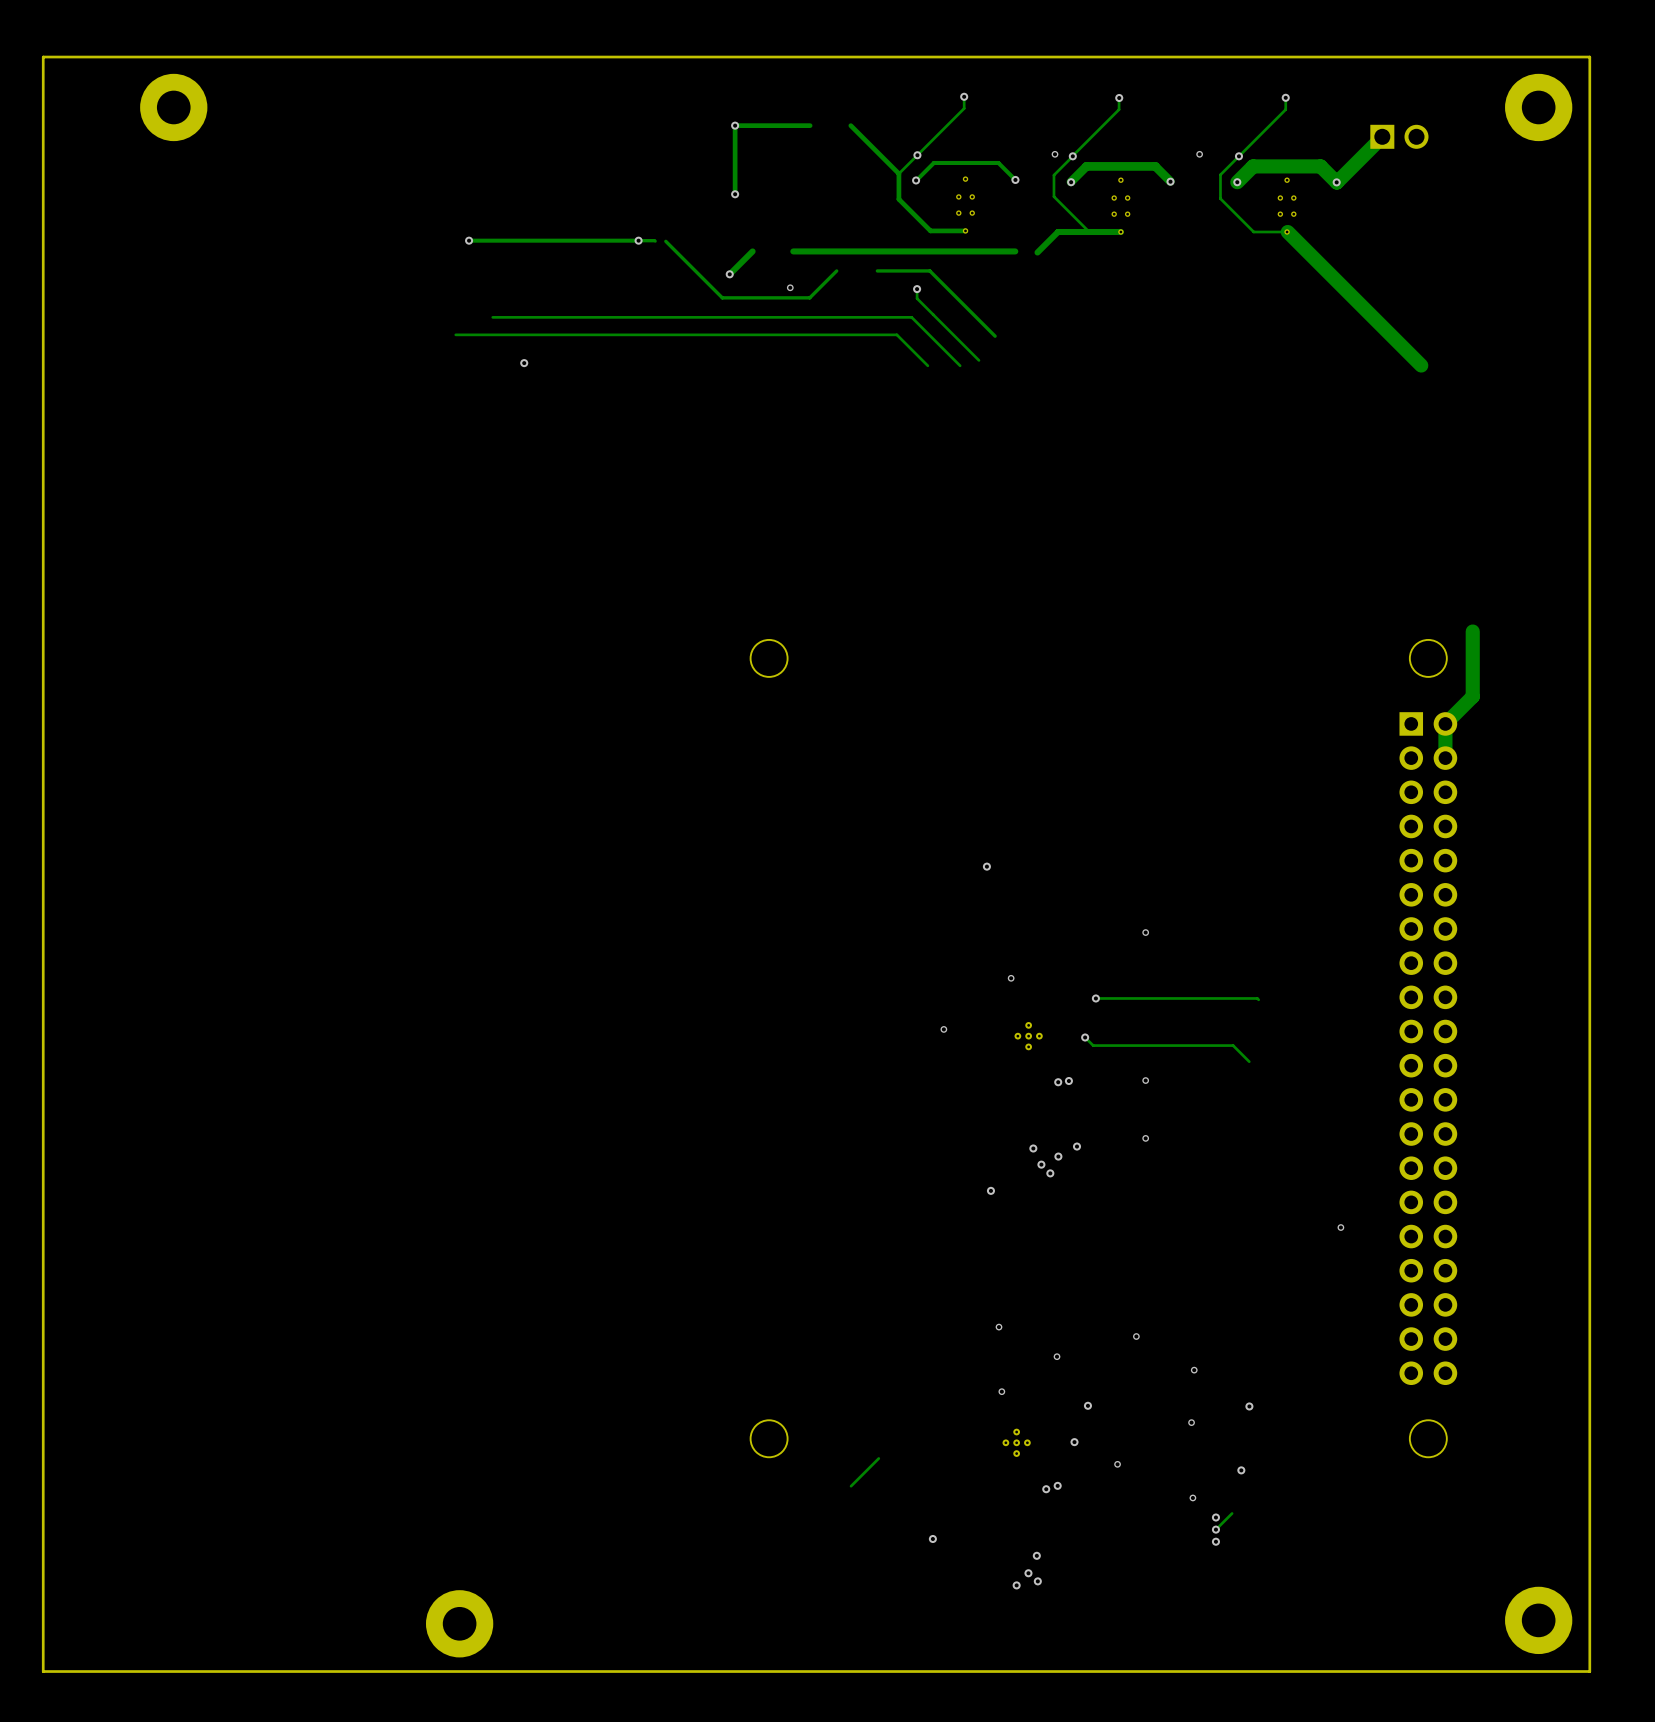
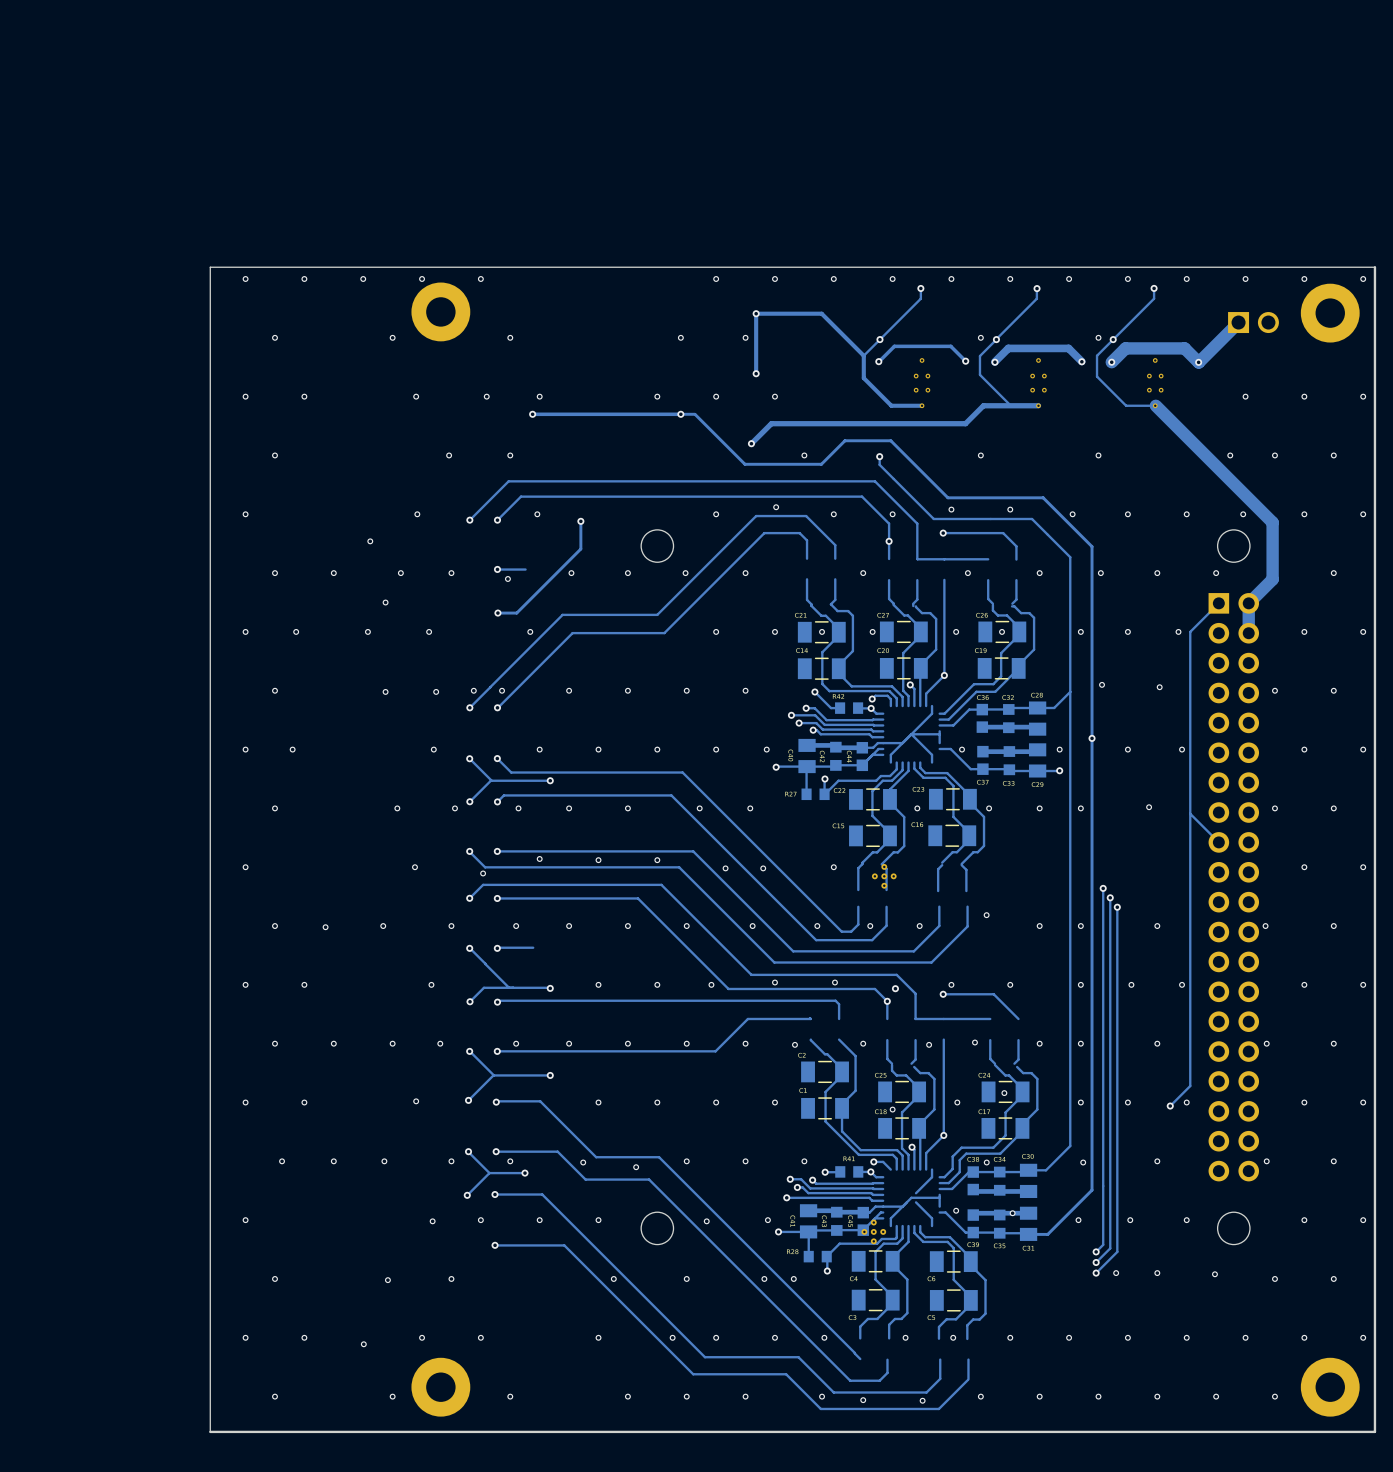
track: (964, 96) (964, 108) (898, 173) -> (920, 288) (920, 298) (863, 355)
via: (964, 96) -> none
track: (1119, 97) (1119, 109) (1072, 155) -> (1036, 288) (1036, 298) (996, 339)
via: (1119, 97) -> none
track: (1285, 97) (1285, 109) (1220, 174) (1220, 198) (1253, 232) (1287, 232) -> (1154, 288) (1154, 298) (1097, 355) (1097, 376) (1126, 405) (1155, 405)
via: (1285, 97) -> none
part: (173, 107) -> none
part position: (1538, 107) -> (1330, 313)
via: (735, 125) -> none
track: (810, 125) (735, 125) (735, 194) -> none
track: (850, 125) (898, 173) -> none
part position: (1399, 136) -> (1253, 322)
track: (1382, 137) (1336, 182) -> (1238, 322) (1198, 362)
via: (1054, 154) -> none
via: (1199, 154) -> none
via: (917, 155) -> none
track: (1072, 156) (1053, 175) (1053, 196) (1088, 231) -> (996, 339) (979, 356) (979, 374) (1010, 405)
via: (1072, 156) -> none
via: (1238, 156) -> none
track: (898, 173) (898, 199) (930, 230) (965, 230) -> (863, 355) (863, 378) (891, 405) (922, 405)
track: (1015, 179) (998, 162) (933, 162) (916, 180) -> (965, 361) (950, 346) (894, 346) (879, 361)
via: (1015, 179) -> none
via: (916, 180) -> none
track: (1170, 181) (1155, 166) (1086, 166) (1070, 181) -> (1081, 361) (1068, 348) (1008, 348) (994, 361)
via: (1170, 181) -> none
via: (1071, 182) -> none
track: (1237, 182) (1253, 166) (1320, 166) (1336, 182) -> (1111, 362) (1125, 348) (1184, 348) (1198, 362)
via: (1237, 182) -> none
via: (1336, 182) -> none
via: (735, 194) -> none
part: (965, 205) -> none
part: (1120, 206) -> none
part: (1287, 206) -> none
track: (1120, 232) (1058, 232) (1037, 252) -> none
track: (1287, 232) (1421, 365) -> (1155, 405) (1272, 522)
track: (469, 240) (655, 241) -> none
via: (469, 240) -> none
via: (638, 240) -> none
track: (665, 241) (722, 297) (809, 297) (836, 270) -> none
track: (752, 251) (729, 274) -> none
track: (1015, 251) (793, 251) -> none
track: (877, 270) (929, 270) (995, 336) -> none
via: (729, 274) -> none
via: (790, 287) -> none
track: (917, 289) (917, 298) (978, 360) -> none
via: (917, 289) -> none
track: (492, 317) (911, 317) (960, 365) -> none
track: (455, 334) (896, 334) (927, 365) -> none
board edge: (1589, 339) (1589, 57) (43, 57) (43, 1671) (257, 1671) -> (1374, 267) (210, 267) (210, 1431)
via: none -> (245, 279)
via: none -> (304, 279)
via: none -> (363, 279)
via: none -> (422, 279)
via: none -> (480, 279)
via: none -> (716, 279)
via: none -> (774, 279)
via: none -> (833, 279)
via: none -> (892, 279)
via: none -> (951, 279)
via: none -> (1010, 279)
via: none -> (1069, 279)
via: none -> (1127, 279)
via: none -> (1186, 279)
via: none -> (1245, 279)
via: none -> (1304, 279)
via: none -> (1363, 279)
via: (524, 363) -> none
via: none -> (920, 288)
via: none -> (1037, 288)
via: none -> (1154, 288)
part: none -> (440, 311)
via: none -> (756, 313)
via: none -> (274, 337)
via: none -> (392, 337)
via: none -> (510, 337)
via: none -> (680, 337)
via: none -> (745, 337)
via: none -> (980, 337)
via: none -> (1098, 337)
via: none -> (879, 339)
via: none -> (996, 339)
via: none -> (1113, 339)
track: none -> (863, 355) (821, 313) (756, 313) (756, 373)
via: none -> (878, 361)
via: none -> (965, 361)
via: none -> (1081, 361)
via: none -> (994, 362)
via: none -> (1111, 362)
via: none -> (1198, 362)
via: none -> (756, 373)
part: none -> (922, 383)
part: none -> (1038, 383)
part: none -> (1155, 383)
via: none -> (245, 396)
via: none -> (304, 396)
via: none -> (416, 396)
via: none -> (486, 396)
via: none -> (539, 396)
via: none -> (657, 396)
via: none -> (716, 396)
via: none -> (774, 396)
via: none -> (1245, 396)
via: none -> (1304, 396)
via: none -> (1363, 396)
track: none -> (1038, 405) (983, 405) (965, 423) (771, 423) (751, 443)
track: none -> (532, 414) (694, 414) (744, 464) (821, 464) (844, 440) (890, 440) (947, 497) (1043, 497) (1092, 546) (1092, 1190) (1047, 1234) (965, 1232) (945, 1212) (939, 1212)
via: none -> (532, 414)
via: none -> (680, 414)
via: none -> (751, 443)
via: none -> (274, 455)
via: none -> (449, 455)
via: none -> (510, 455)
via: none -> (804, 455)
via: none -> (980, 455)
via: none -> (1098, 455)
via: none -> (1230, 455)
via: none -> (1274, 455)
via: none -> (1333, 455)
track: none -> (879, 456) (879, 464) (933, 518) (1032, 518) (1070, 557) (1070, 1146) (1046, 1170) (969, 1172) (952, 1188) (939, 1188)
via: none -> (879, 456)
via: none -> (776, 507)
via: none -> (951, 509)
via: none -> (1010, 509)
via: none -> (245, 514)
via: none -> (417, 514)
via: none -> (537, 514)
via: none -> (716, 514)
via: none -> (833, 514)
via: none -> (892, 514)
via: none -> (1072, 514)
via: none -> (1127, 514)
via: none -> (1186, 514)
via: none -> (1243, 514)
via: none -> (1304, 514)
via: none -> (1363, 514)
track: none -> (469, 520) (508, 481) (874, 481) (917, 523) (917, 559) (988, 559)
via: none -> (469, 520)
track: none -> (497, 520) (520, 496) (862, 496) (889, 523) (889, 558)
via: none -> (497, 520)
track: none -> (580, 521) (580, 548) (516, 613) (497, 613)
via: none -> (580, 521)
track: none -> (943, 533) (1003, 533) (1016, 546) (1016, 559)
via: none -> (943, 533)
via: none -> (370, 541)
via: none -> (889, 541)
track: none -> (807, 558) (807, 540) (799, 533) (764, 533) (664, 633) (572, 633) (498, 707)
track: none -> (835, 558) (835, 545) (806, 516) (756, 516) (657, 614) (562, 614) (469, 707)
via: none -> (497, 569)
track: none -> (525, 569) (497, 569)
via: none -> (274, 573)
via: none -> (333, 573)
via: none -> (400, 573)
via: none -> (451, 573)
via: none -> (571, 573)
via: none -> (627, 573)
via: none -> (685, 573)
via: none -> (745, 573)
via: none -> (863, 573)
via: none -> (967, 573)
via: none -> (1039, 573)
via: none -> (1100, 573)
via: none -> (1157, 573)
via: none -> (1216, 573)
via: none -> (1333, 573)
via: none -> (507, 578)
track: none -> (807, 579) (807, 599) (821, 615) (825, 615) (838, 628) (838, 635) (822, 652) (822, 684) (829, 691) (889, 691) (896, 698) (896, 706)
track: none -> (835, 579) (835, 599) (830, 604) (837, 611) (848, 611) (852, 615) (852, 651) (838, 665) (838, 673) (851, 686) (892, 686) (902, 696) (902, 706)
track: none -> (889, 580) (889, 598) (904, 615) (907, 615) (920, 628) (920, 635) (903, 653) (903, 690) (908, 696) (908, 706)
track: none -> (917, 580) (917, 599) (913, 603)
track: none -> (944, 579) (944, 675) (926, 693) (926, 706)
track: none -> (988, 580) (988, 599) (992, 603)
track: none -> (1016, 580) (1016, 599) (1012, 603)
via: none -> (385, 602)
track: none -> (1218, 603) (1190, 631) (1190, 1086) (1170, 1106)
track: none -> (913, 604) (913, 606)
track: none -> (992, 605) (992, 610) (997, 615) (1007, 615) (1019, 628)
track: none -> (915, 606) (922, 613) (930, 613) (936, 618) (936, 649) (920, 664) (920, 667)
track: none -> (1012, 606) (1021, 613) (1029, 613) (1034, 617) (1034, 649) (1019, 663) (1019, 666)
via: none -> (497, 613)
via: none -> (245, 631)
via: none -> (296, 631)
via: none -> (367, 631)
via: none -> (429, 631)
via: none -> (530, 631)
via: none -> (716, 631)
via: none -> (774, 631)
via: none -> (822, 631)
via: none -> (872, 631)
part: none -> (903, 631)
via: none -> (956, 631)
part: none -> (1002, 631)
via: none -> (1002, 631)
track: none -> (1019, 631) (1019, 634) (1001, 653) (1001, 676) (993, 684) (974, 684) (944, 713) (939, 713)
via: none -> (1080, 631)
via: none -> (1127, 631)
via: none -> (1178, 631)
via: none -> (1304, 631)
via: none -> (1363, 631)
part: none -> (821, 632)
part: none -> (821, 668)
part: none -> (903, 668)
track: none -> (920, 668) (920, 706)
part: none -> (1001, 668)
track: none -> (1018, 668) (995, 691) (976, 691) (948, 719) (939, 719)
via: none -> (944, 675)
track: none -> (910, 684) (914, 688) (914, 706)
via: none -> (910, 684)
via: none -> (1102, 684)
via: none -> (1159, 687)
via: none -> (274, 690)
via: none -> (473, 690)
via: none -> (502, 690)
via: none -> (569, 690)
via: none -> (627, 690)
via: none -> (686, 690)
via: none -> (745, 690)
via: none -> (1274, 690)
via: none -> (1333, 690)
via: none -> (385, 691)
via: none -> (436, 691)
track: none -> (814, 691) (831, 708) (840, 708)
via: none -> (814, 691)
track: none -> (1070, 691) (1054, 708) (982, 709)
track: none -> (872, 699) (875, 695) (887, 695) (890, 699) (890, 706)
via: none -> (872, 699)
track: none -> (932, 706) (932, 713) (890, 754) (890, 762)
via: none -> (469, 707)
via: none -> (497, 707)
track: none -> (806, 708) (814, 708) (826, 720) (883, 719)
via: none -> (806, 708)
part: none -> (849, 708)
track: none -> (856, 708) (871, 708) (876, 713) (883, 713)
via: none -> (871, 708)
track: none -> (982, 709) (969, 709) (953, 725) (939, 725)
track: none -> (791, 715) (815, 715) (824, 724) (883, 725)
via: none -> (791, 715)
part: none -> (982, 718)
part: none -> (1008, 718)
part: none -> (1037, 718)
track: none -> (799, 723) (816, 723) (822, 729) (883, 731)
via: none -> (799, 723)
track: none -> (982, 727) (1035, 727) (1037, 729)
via: (986, 866) -> none
track: none -> (813, 730) (816, 730) (820, 734) (869, 734) (872, 737) (883, 737)
via: none -> (813, 730)
track: none -> (939, 731) (939, 743)
track: none -> (939, 734) (911, 734) (932, 754) (932, 762)
via: none -> (1092, 738)
track: none -> (902, 743) (877, 743) (873, 747) (807, 745)
track: none -> (883, 748) (878, 748) (862, 765) (836, 765)
track: none -> (939, 748) (950, 748) (970, 769) (1059, 770)
via: none -> (245, 749)
via: none -> (292, 749)
via: none -> (433, 749)
via: none -> (539, 749)
via: none -> (598, 749)
via: none -> (657, 749)
via: none -> (716, 749)
via: none -> (766, 749)
via: none -> (962, 749)
track: none -> (1037, 749) (1035, 751) (982, 751)
via: none -> (1059, 749)
via: none -> (1127, 749)
via: none -> (1182, 749)
via: none -> (1304, 749)
via: none -> (1363, 749)
track: none -> (883, 754) (872, 754)
part: none -> (807, 756)
part: none -> (835, 756)
part: none -> (862, 756)
track: none -> (469, 758) (491, 780) (550, 780)
via: none -> (469, 758)
track: none -> (497, 758) (511, 772) (682, 772) (841, 931) (851, 931) (858, 924) (858, 906)
via: none -> (497, 758)
part: none -> (982, 760)
part: none -> (1009, 760)
part: none -> (1037, 760)
track: none -> (896, 762) (896, 769) (890, 776) (880, 776) (876, 780) (838, 780) (824, 794) (824, 778)
track: none -> (902, 762) (902, 770) (892, 780) (882, 780) (872, 791) (872, 815) (889, 833) (889, 839) (877, 852) (872, 852) (858, 868) (858, 890)
track: none -> (908, 762) (908, 770) (889, 789) (889, 799)
track: none -> (914, 762) (914, 768) (923, 777) (945, 777) (953, 785) (953, 816) (969, 832) (969, 835)
track: none -> (920, 762) (920, 767) (925, 773) (947, 773) (969, 795) (969, 799)
track: none -> (835, 765) (776, 767)
track: none -> (807, 766) (806, 794)
via: none -> (776, 767)
via: none -> (1059, 770)
via: none -> (824, 778)
track: none -> (490, 780) (469, 801)
via: none -> (550, 780)
via: (1145, 932) -> none
part: none -> (815, 794)
part: none -> (872, 799)
part: none -> (952, 799)
via: none -> (469, 801)
track: none -> (497, 801) (503, 795) (671, 795) (816, 940) (872, 940) (886, 925) (886, 906)
via: none -> (497, 801)
track: none -> (889, 804) (904, 817) (904, 846) (897, 852) (893, 852) (881, 864) (886, 868) (886, 890)
track: none -> (970, 803) (984, 816) (984, 845) (977, 852) (973, 852) (961, 863)
via: none -> (1149, 807)
via: none -> (274, 808)
via: none -> (397, 808)
via: none -> (454, 808)
via: none -> (518, 808)
via: none -> (569, 808)
via: none -> (627, 808)
via: none -> (699, 808)
via: none -> (750, 808)
via: none -> (917, 808)
via: none -> (989, 808)
via: none -> (1039, 808)
via: none -> (1080, 808)
via: none -> (1274, 808)
via: none -> (1333, 808)
track: none -> (1190, 813) (1218, 842)
via: (1011, 978) -> none
part: none -> (872, 835)
part: none -> (952, 835)
track: none -> (969, 839) (956, 852) (952, 852) (942, 862)
track: (1095, 998) (1258, 999) -> none
via: (1095, 998) -> none
via: none -> (469, 851)
track: none -> (497, 851) (693, 851) (793, 951) (913, 951) (939, 925) (939, 906)
via: none -> (497, 851)
track: none -> (469, 851) (485, 867) (679, 867) (774, 962) (931, 962) (967, 926) (967, 906)
via: none -> (539, 858)
via: none -> (598, 860)
via: none -> (657, 860)
track: none -> (942, 865) (938, 869) (938, 891)
track: none -> (961, 865) (966, 869) (966, 891)
via: none -> (245, 867)
via: none -> (414, 867)
via: none -> (833, 867)
via: none -> (1304, 867)
via: none -> (1363, 867)
via: none -> (725, 868)
via: none -> (763, 868)
via: (943, 1029) -> none
via: none -> (483, 873)
track: (1085, 1037) (1093, 1045) (1233, 1045) (1249, 1061) -> none
via: (1085, 1037) -> none
track: none -> (1103, 888) (1103, 1244) (1096, 1251)
via: none -> (1103, 888)
track: none -> (1110, 897) (1110, 1248) (1096, 1262)
via: none -> (1110, 897)
track: none -> (469, 898) (483, 884) (661, 884) (751, 974) (896, 974) (915, 993) (915, 1018) (990, 1018)
via: none -> (469, 898)
track: none -> (497, 898) (638, 898) (728, 988) (874, 988) (887, 1001) (887, 1018)
via: none -> (497, 898)
track: none -> (1117, 907) (1117, 1251) (1096, 1273)
via: none -> (1117, 907)
via: (1068, 1081) -> none
via: (1058, 1082) -> none
via: none -> (274, 926)
via: none -> (383, 926)
via: none -> (451, 926)
via: none -> (516, 926)
via: none -> (569, 926)
via: none -> (627, 926)
via: none -> (686, 926)
via: none -> (752, 926)
via: none -> (817, 926)
via: none -> (870, 926)
via: none -> (919, 926)
via: none -> (1039, 926)
via: none -> (1080, 926)
via: none -> (1157, 926)
via: none -> (1265, 926)
via: none -> (1333, 926)
via: none -> (325, 927)
track: none -> (533, 947) (497, 948)
track: none -> (469, 948) (509, 987)
via: none -> (469, 948)
via: none -> (497, 948)
via: (1145, 1138) -> none
via: (1077, 1146) -> none
via: (1033, 1148) -> none
via: (1058, 1156) -> none
via: none -> (774, 982)
via: none -> (834, 982)
via: none -> (245, 984)
via: none -> (304, 984)
via: none -> (431, 984)
via: none -> (598, 984)
via: none -> (657, 984)
via: none -> (711, 984)
via: none -> (951, 984)
via: none -> (1010, 984)
via: none -> (1080, 984)
via: none -> (1131, 984)
via: none -> (1182, 984)
via: none -> (1304, 984)
via: none -> (1363, 984)
track: none -> (550, 988) (483, 987) (469, 1001)
via: none -> (550, 988)
track: none -> (943, 994) (993, 994) (1018, 1018)
via: none -> (943, 994)
via: (1050, 1173) -> none
via: none -> (470, 1001)
track: none -> (497, 1001) (835, 1000) (839, 1004) (839, 1018)
via: none -> (887, 1001)
via: none -> (497, 1002)
via: (990, 1190) -> none
track: none -> (809, 1018) (747, 1018) (715, 1051) (497, 1051)
track: none -> (810, 1039) (842, 1068) (842, 1075) (825, 1091) (825, 1121) (858, 1154)
track: none -> (839, 1039) (855, 1056) (855, 1090) (842, 1104) (842, 1131) (860, 1150) (897, 1150) (902, 1155) (902, 1169)
track: none -> (943, 1039) (943, 1135) (926, 1153) (926, 1169)
track: none -> (887, 1040) (887, 1058) (892, 1063)
track: none -> (915, 1040) (915, 1059) (911, 1063)
track: none -> (990, 1040) (990, 1058) (994, 1063)
track: none -> (1018, 1040) (1018, 1059) (1014, 1063)
via: none -> (974, 1042)
via: none -> (274, 1043)
via: none -> (333, 1043)
via: none -> (392, 1043)
via: none -> (440, 1043)
via: none -> (516, 1043)
via: none -> (569, 1043)
via: none -> (627, 1043)
via: none -> (686, 1043)
via: none -> (745, 1043)
via: none -> (863, 1043)
via: none -> (1039, 1043)
via: none -> (1080, 1043)
via: none -> (1266, 1043)
via: none -> (1333, 1043)
via: none -> (794, 1044)
via: none -> (929, 1044)
track: none -> (469, 1051) (493, 1075)
via: none -> (469, 1051)
via: none -> (497, 1051)
track: none -> (892, 1065) (892, 1070) (896, 1075) (906, 1075) (919, 1088)
track: none -> (994, 1065) (1022, 1088)
track: none -> (914, 1067) (920, 1073) (928, 1073) (934, 1078) (934, 1109) (919, 1124)
track: none -> (1017, 1067) (1023, 1073) (1031, 1073) (1037, 1078) (1037, 1109) (1022, 1124)
part: none -> (825, 1071)
track: none -> (550, 1075) (493, 1075) (468, 1100)
via: none -> (550, 1075)
part: none -> (902, 1091)
track: none -> (919, 1091) (919, 1095) (902, 1112) (902, 1148) (908, 1154) (908, 1169)
part: none -> (1005, 1091)
track: none -> (1022, 1091) (1022, 1095) (1005, 1112) (1005, 1135) (993, 1147) (961, 1147) (952, 1156) (952, 1168) (944, 1177) (939, 1177)
via: none -> (1004, 1093)
via: none -> (468, 1100)
via: none -> (416, 1101)
track: none -> (496, 1101) (540, 1101) (596, 1157) (659, 1157) (860, 1359)
via: none -> (245, 1102)
via: none -> (304, 1102)
via: none -> (496, 1102)
via: none -> (598, 1102)
via: none -> (657, 1102)
via: none -> (716, 1102)
via: none -> (774, 1102)
via: none -> (957, 1102)
via: none -> (1080, 1102)
via: none -> (1127, 1102)
via: none -> (1186, 1102)
via: none -> (1304, 1102)
via: none -> (1363, 1102)
via: none -> (1170, 1106)
part: none -> (825, 1108)
via: none -> (892, 1109)
part: none -> (902, 1128)
track: none -> (919, 1128) (920, 1169)
part: none -> (1005, 1128)
via: (998, 1327) -> none
track: none -> (1018, 1131) (1018, 1135) (1000, 1153) (966, 1153) (959, 1160) (959, 1172) (948, 1183) (939, 1183)
via: none -> (943, 1135)
via: (1136, 1336) -> none
track: none -> (912, 1147) (914, 1149) (914, 1169)
via: none -> (912, 1147)
track: none -> (468, 1151) (489, 1173)
via: none -> (468, 1151)
track: none -> (496, 1151) (557, 1151) (585, 1179) (649, 1179) (850, 1380) (879, 1380) (887, 1372) (887, 1359)
via: none -> (496, 1151)
track: none -> (858, 1154) (892, 1154) (896, 1158) (896, 1169)
via: (1057, 1356) -> none
via: none -> (282, 1161)
via: none -> (333, 1161)
via: none -> (384, 1161)
via: none -> (451, 1161)
via: none -> (510, 1161)
via: none -> (686, 1161)
via: none -> (745, 1161)
via: none -> (804, 1161)
track: none -> (873, 1161) (883, 1161) (890, 1169)
via: none -> (873, 1161)
via: none -> (1157, 1161)
via: none -> (1266, 1161)
via: none -> (1333, 1161)
via: none -> (583, 1162)
via: none -> (986, 1162)
via: none -> (1083, 1162)
via: none -> (636, 1167)
via: (1194, 1370) -> none
track: none -> (932, 1169) (932, 1177) (916, 1193)
via: none -> (825, 1172)
track: none -> (840, 1171) (825, 1172)
part: none -> (849, 1171)
track: none -> (858, 1171) (870, 1171) (876, 1177) (883, 1177)
via: none -> (870, 1171)
track: none -> (489, 1173) (467, 1195)
track: none -> (524, 1173) (489, 1173)
via: none -> (524, 1173)
track: none -> (790, 1179) (801, 1179) (810, 1188) (883, 1189)
via: none -> (790, 1179)
track: none -> (812, 1180) (816, 1183) (883, 1183)
via: none -> (812, 1180)
part: none -> (973, 1180)
part: none -> (999, 1181)
part: none -> (1028, 1180)
track: none -> (797, 1187) (802, 1187) (808, 1193) (883, 1194)
via: none -> (797, 1187)
via: (1001, 1391) -> none
track: none -> (973, 1189) (975, 1191) (1028, 1191)
via: none -> (467, 1195)
track: none -> (494, 1194) (542, 1194) (704, 1357) (798, 1357) (833, 1392) (926, 1392) (940, 1378) (940, 1359)
via: none -> (494, 1194)
track: none -> (939, 1194) (939, 1206)
track: none -> (786, 1197) (869, 1197) (872, 1200) (883, 1200)
via: none -> (786, 1197)
track: none -> (939, 1197) (911, 1197) (890, 1218) (890, 1226)
via: (1087, 1405) -> none
via: (1249, 1406) -> none
track: none -> (916, 1202) (932, 1218) (932, 1226)
track: none -> (902, 1206) (875, 1206) (869, 1212) (808, 1210)
via: none -> (956, 1210)
track: none -> (883, 1212) (880, 1212) (863, 1230) (808, 1231)
track: none -> (1028, 1213) (975, 1213) (973, 1215)
via position: (1191, 1422) -> (1012, 1213)
track: none -> (883, 1218) (875, 1218)
via: none -> (245, 1220)
via: none -> (480, 1220)
via: none -> (539, 1220)
via: none -> (598, 1220)
via: none -> (767, 1220)
via: none -> (1078, 1220)
via: none -> (1130, 1220)
via: none -> (1186, 1220)
via: none -> (1304, 1220)
via: none -> (1363, 1220)
via: none -> (432, 1221)
via: none -> (706, 1221)
part: none -> (808, 1221)
part: none -> (836, 1221)
part: none -> (863, 1221)
part: none -> (973, 1223)
part: none -> (999, 1224)
part: none -> (1028, 1223)
track: none -> (896, 1226) (895, 1238) (881, 1238) (877, 1243) (839, 1243) (826, 1256) (827, 1271)
track: none -> (902, 1226) (902, 1238) (897, 1243) (883, 1243) (875, 1251) (875, 1279) (892, 1296) (892, 1303) (877, 1318) (867, 1318) (860, 1326) (860, 1338)
track: none -> (908, 1226) (908, 1241) (892, 1257) (892, 1261)
track: none -> (914, 1226) (914, 1232) (923, 1241) (947, 1241) (953, 1248) (953, 1279) (970, 1296) (970, 1300)
track: none -> (920, 1226) (920, 1232) (925, 1237) (949, 1237) (970, 1258) (970, 1261)
via: none -> (778, 1231)
track: none -> (808, 1231) (778, 1231)
track: none -> (808, 1231) (808, 1256)
via: (1074, 1442) -> none
track: none -> (494, 1244) (564, 1245) (693, 1374) (786, 1374) (820, 1408) (938, 1408) (967, 1380)
via: none -> (495, 1245)
track: (878, 1458) (851, 1486) -> none
via: (1117, 1464) -> none
via: none -> (1096, 1251)
via: (1241, 1470) -> none
part: none -> (817, 1256)
part: none -> (875, 1261)
part: none -> (953, 1261)
via: none -> (1096, 1262)
track: none -> (892, 1268) (896, 1268) (907, 1279) (907, 1313) (901, 1318) (894, 1318) (889, 1324) (889, 1338)
via: (1057, 1485) -> none
track: none -> (974, 1269) (985, 1280) (985, 1313) (979, 1319) (973, 1319) (967, 1325) (967, 1338)
via: none -> (827, 1271)
via: (1046, 1489) -> none
via: none -> (1096, 1273)
via: none -> (1116, 1273)
via: none -> (1157, 1273)
via: none -> (1214, 1274)
via: none -> (274, 1278)
via: none -> (451, 1278)
via: none -> (613, 1278)
via: none -> (686, 1278)
via: none -> (764, 1278)
via: none -> (793, 1278)
via: none -> (1274, 1278)
via: none -> (1333, 1278)
via: none -> (387, 1280)
via: (1192, 1497) -> none
track: (1232, 1513) (1215, 1529) -> none
via: (1215, 1517) -> none
part: none -> (875, 1300)
part: none -> (953, 1300)
track: none -> (971, 1303) (956, 1319) (946, 1319) (938, 1326) (938, 1338)
via: (1215, 1529) -> none
via: (932, 1538) -> none
via: (1215, 1541) -> none
via: (1036, 1555) -> none
via: none -> (245, 1337)
via: none -> (304, 1337)
via: none -> (422, 1337)
via: none -> (480, 1337)
via: none -> (598, 1337)
via: none -> (672, 1337)
via: none -> (716, 1337)
via: none -> (774, 1337)
via: none -> (824, 1337)
via: none -> (905, 1337)
via: none -> (953, 1337)
via: none -> (1010, 1337)
via: none -> (1069, 1337)
via: none -> (1127, 1337)
via: none -> (1186, 1337)
via: none -> (1245, 1337)
via: none -> (1304, 1337)
via: none -> (1363, 1337)
via: none -> (363, 1344)
via: (1028, 1573) -> none
via: (1037, 1581) -> none
via: (1016, 1585) -> none
track: none -> (968, 1359) (968, 1379)
part position: (459, 1623) -> (440, 1387)
via: none -> (274, 1396)
via: none -> (392, 1396)
via: none -> (510, 1396)
via: none -> (627, 1396)
via: none -> (686, 1396)
via: none -> (745, 1396)
via: none -> (822, 1396)
via: none -> (980, 1396)
via: none -> (1039, 1396)
via: none -> (1098, 1396)
via: none -> (1157, 1396)
via: none -> (1216, 1396)
via: none -> (1274, 1396)
via: none -> (863, 1400)
via: none -> (922, 1400)

